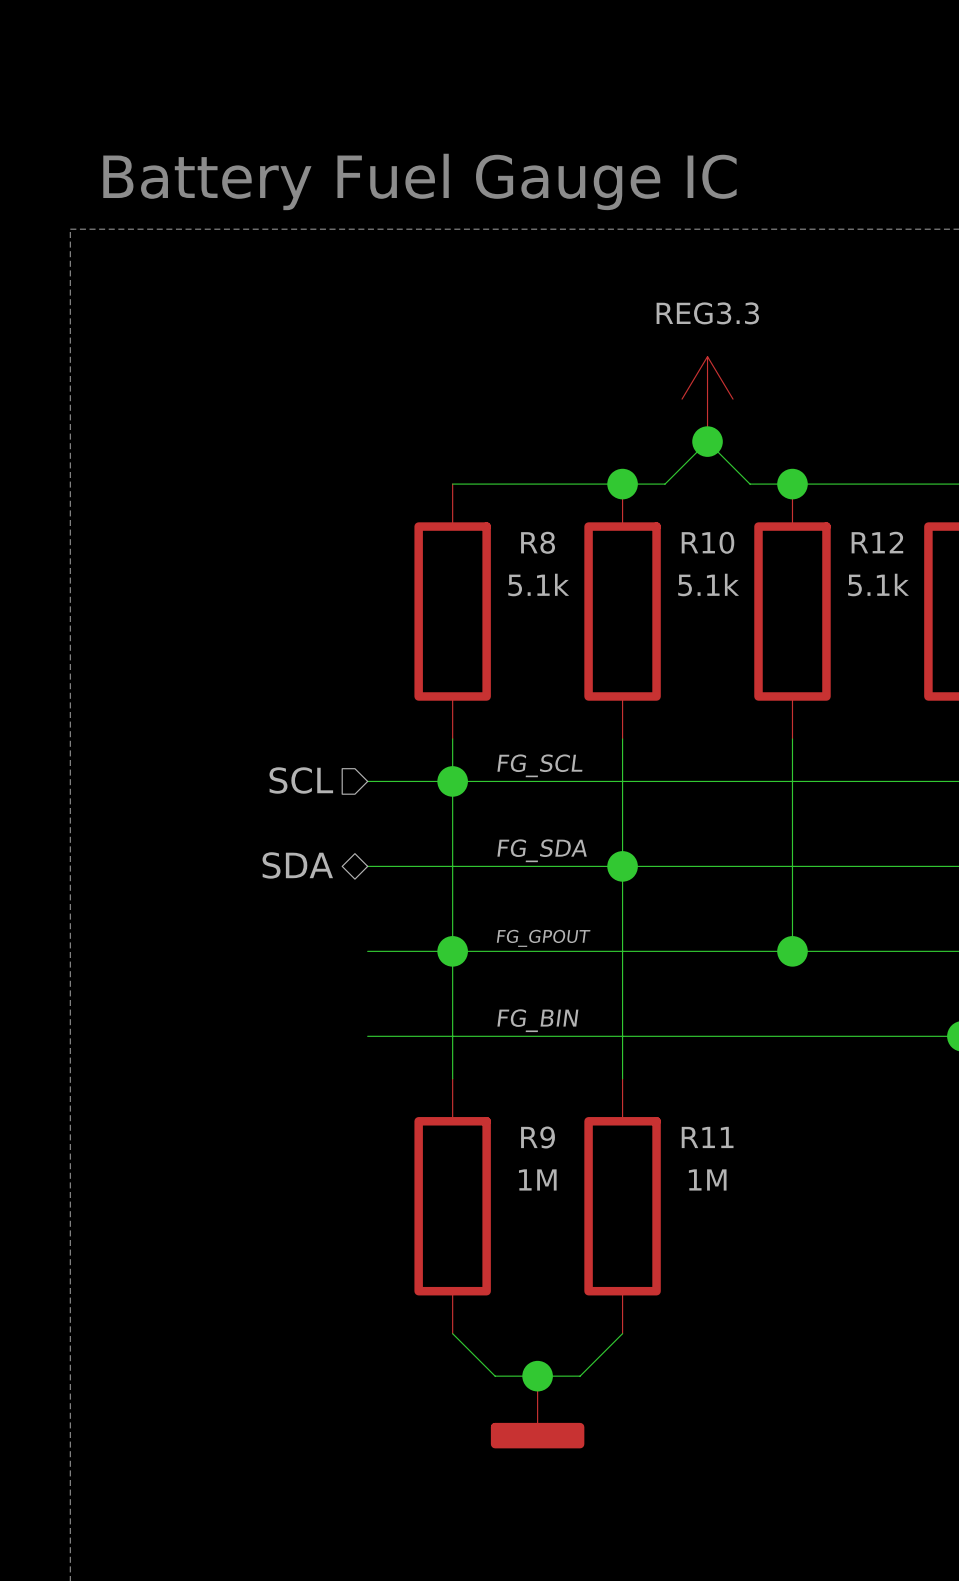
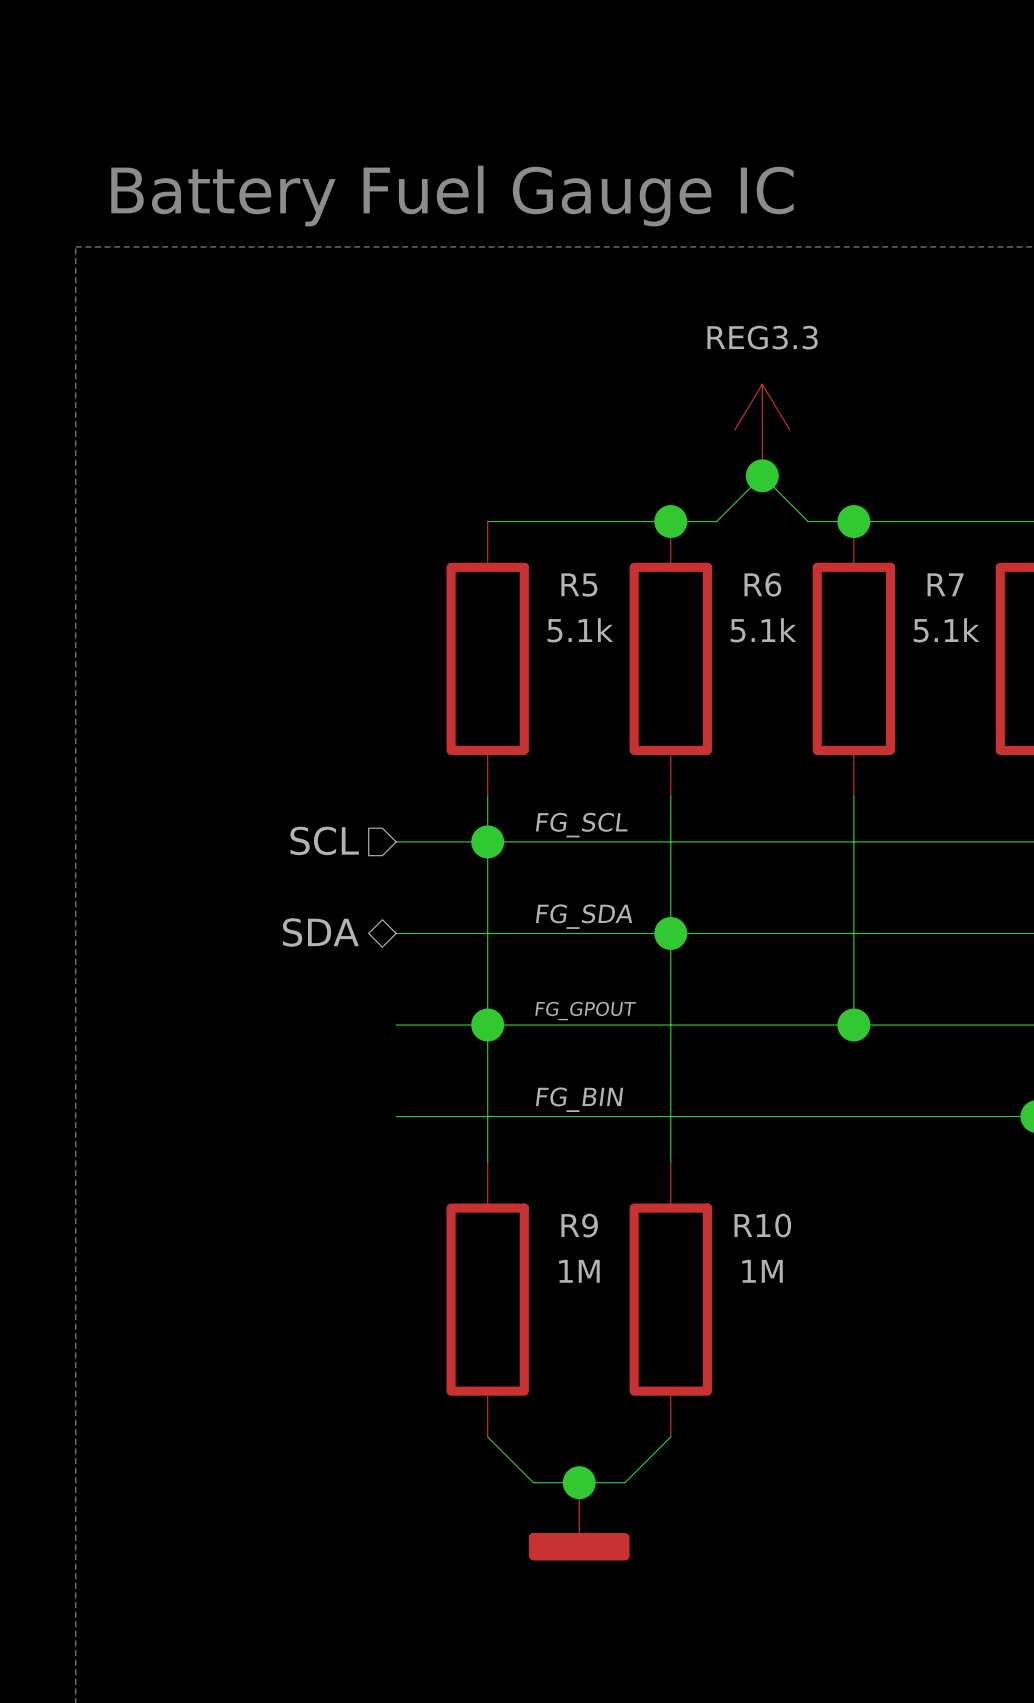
R8 name: R8 (538, 542) -> R5 (579, 585)
R10 name: R10 (707, 542) -> R6 (762, 584)
R12 name: R12 (877, 542) -> R7 (945, 584)
R11 name: R11 (707, 1137) -> R10 (762, 1225)

